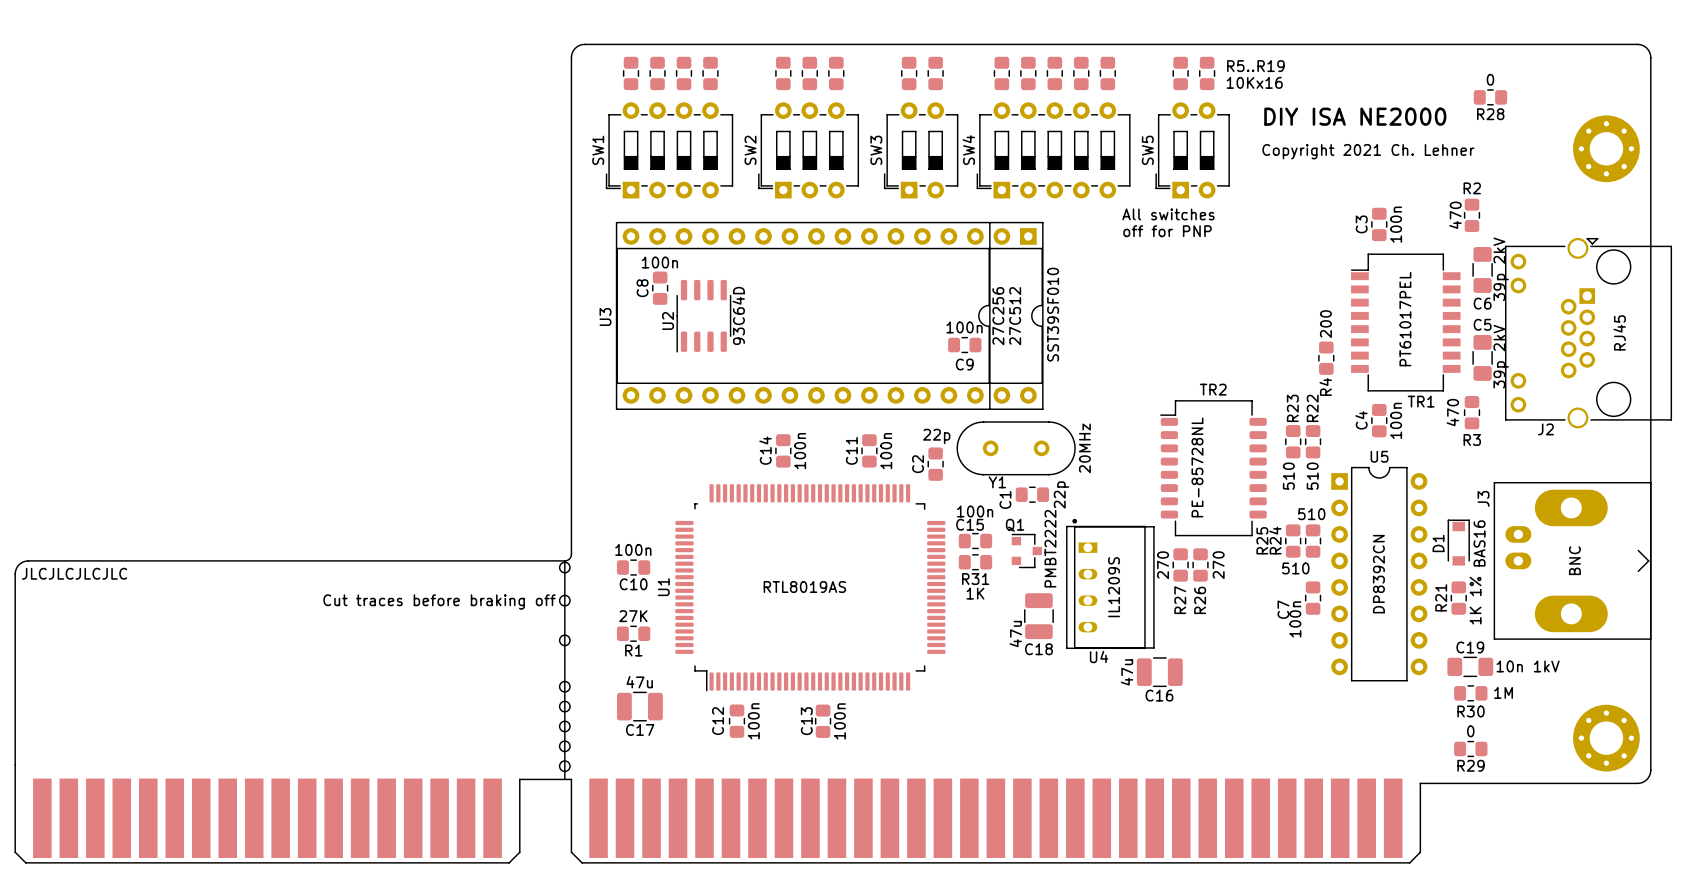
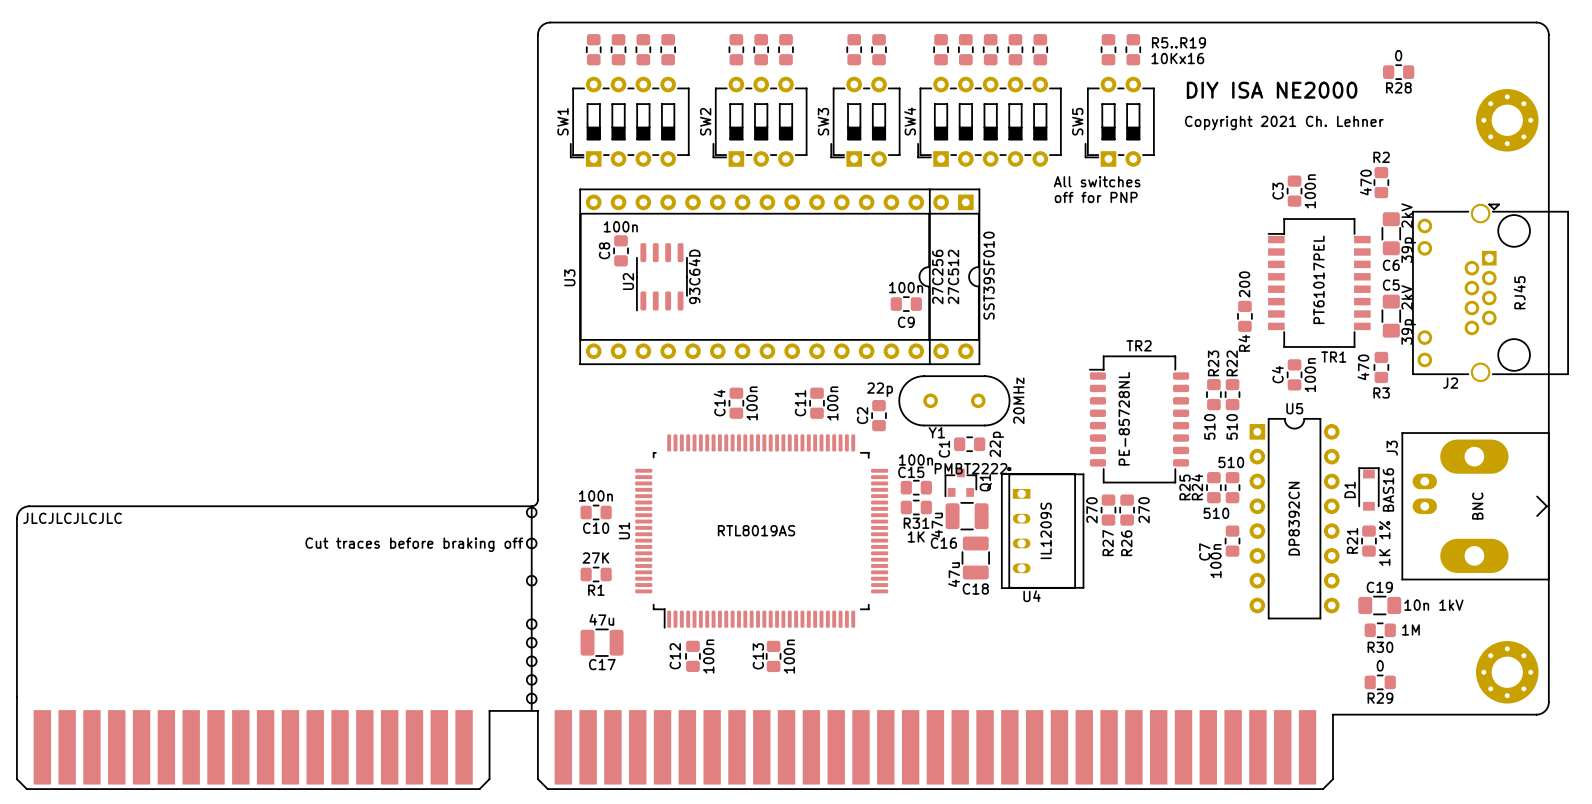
Q1 name position: Q1 (1015, 525) -> Q1 (985, 482)
Q1 rotation: 0° (1026, 551) -> 90° counterclockwise (960, 482)
C16 value position: 47u (1127, 672) -> 47u (937, 525)
C16 position: (1159, 672) -> (967, 516)
C16 name position: C16 (1159, 695) -> C16 (943, 543)

